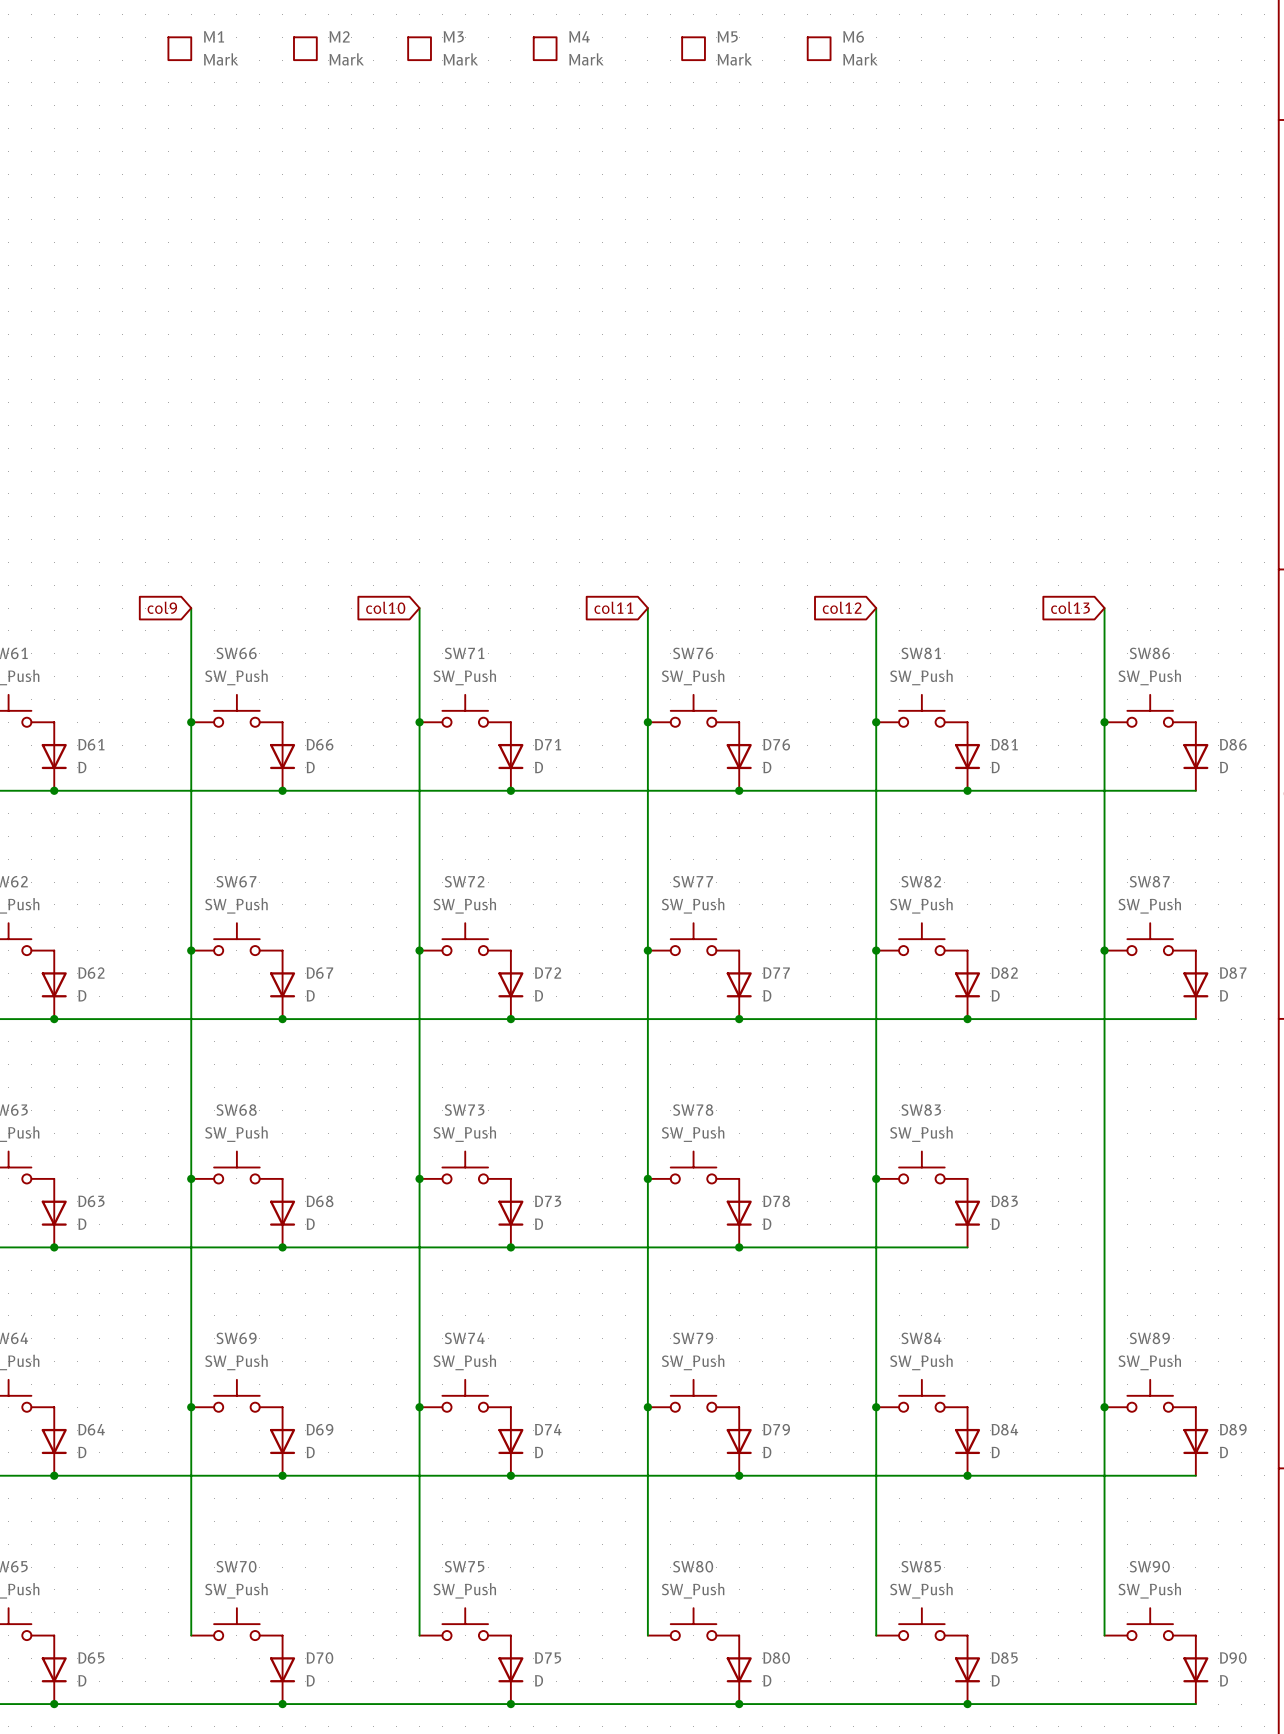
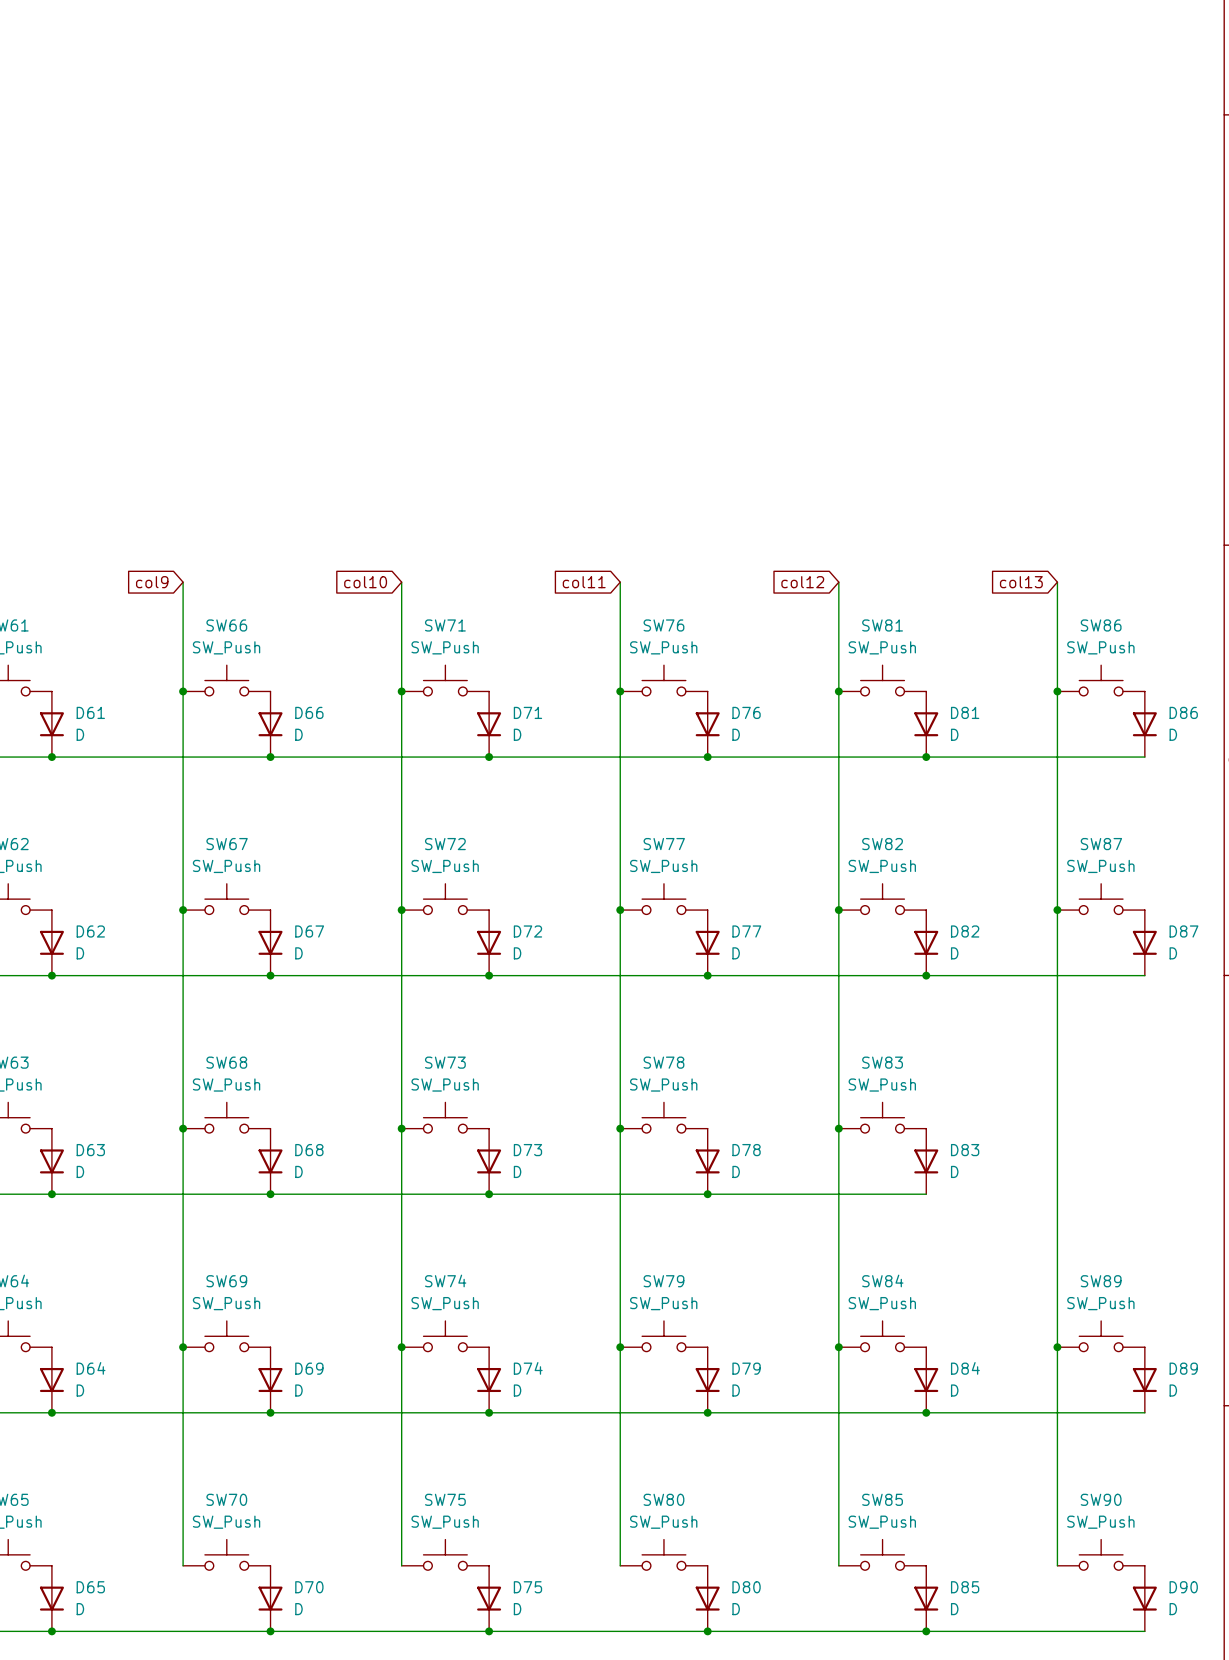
M1: Mark (179, 48) -> none
M2: Mark (305, 48) -> none
M3: Mark (419, 48) -> none
M4: Mark (545, 48) -> none
M5: Mark (693, 48) -> none
M6: Mark (819, 48) -> none

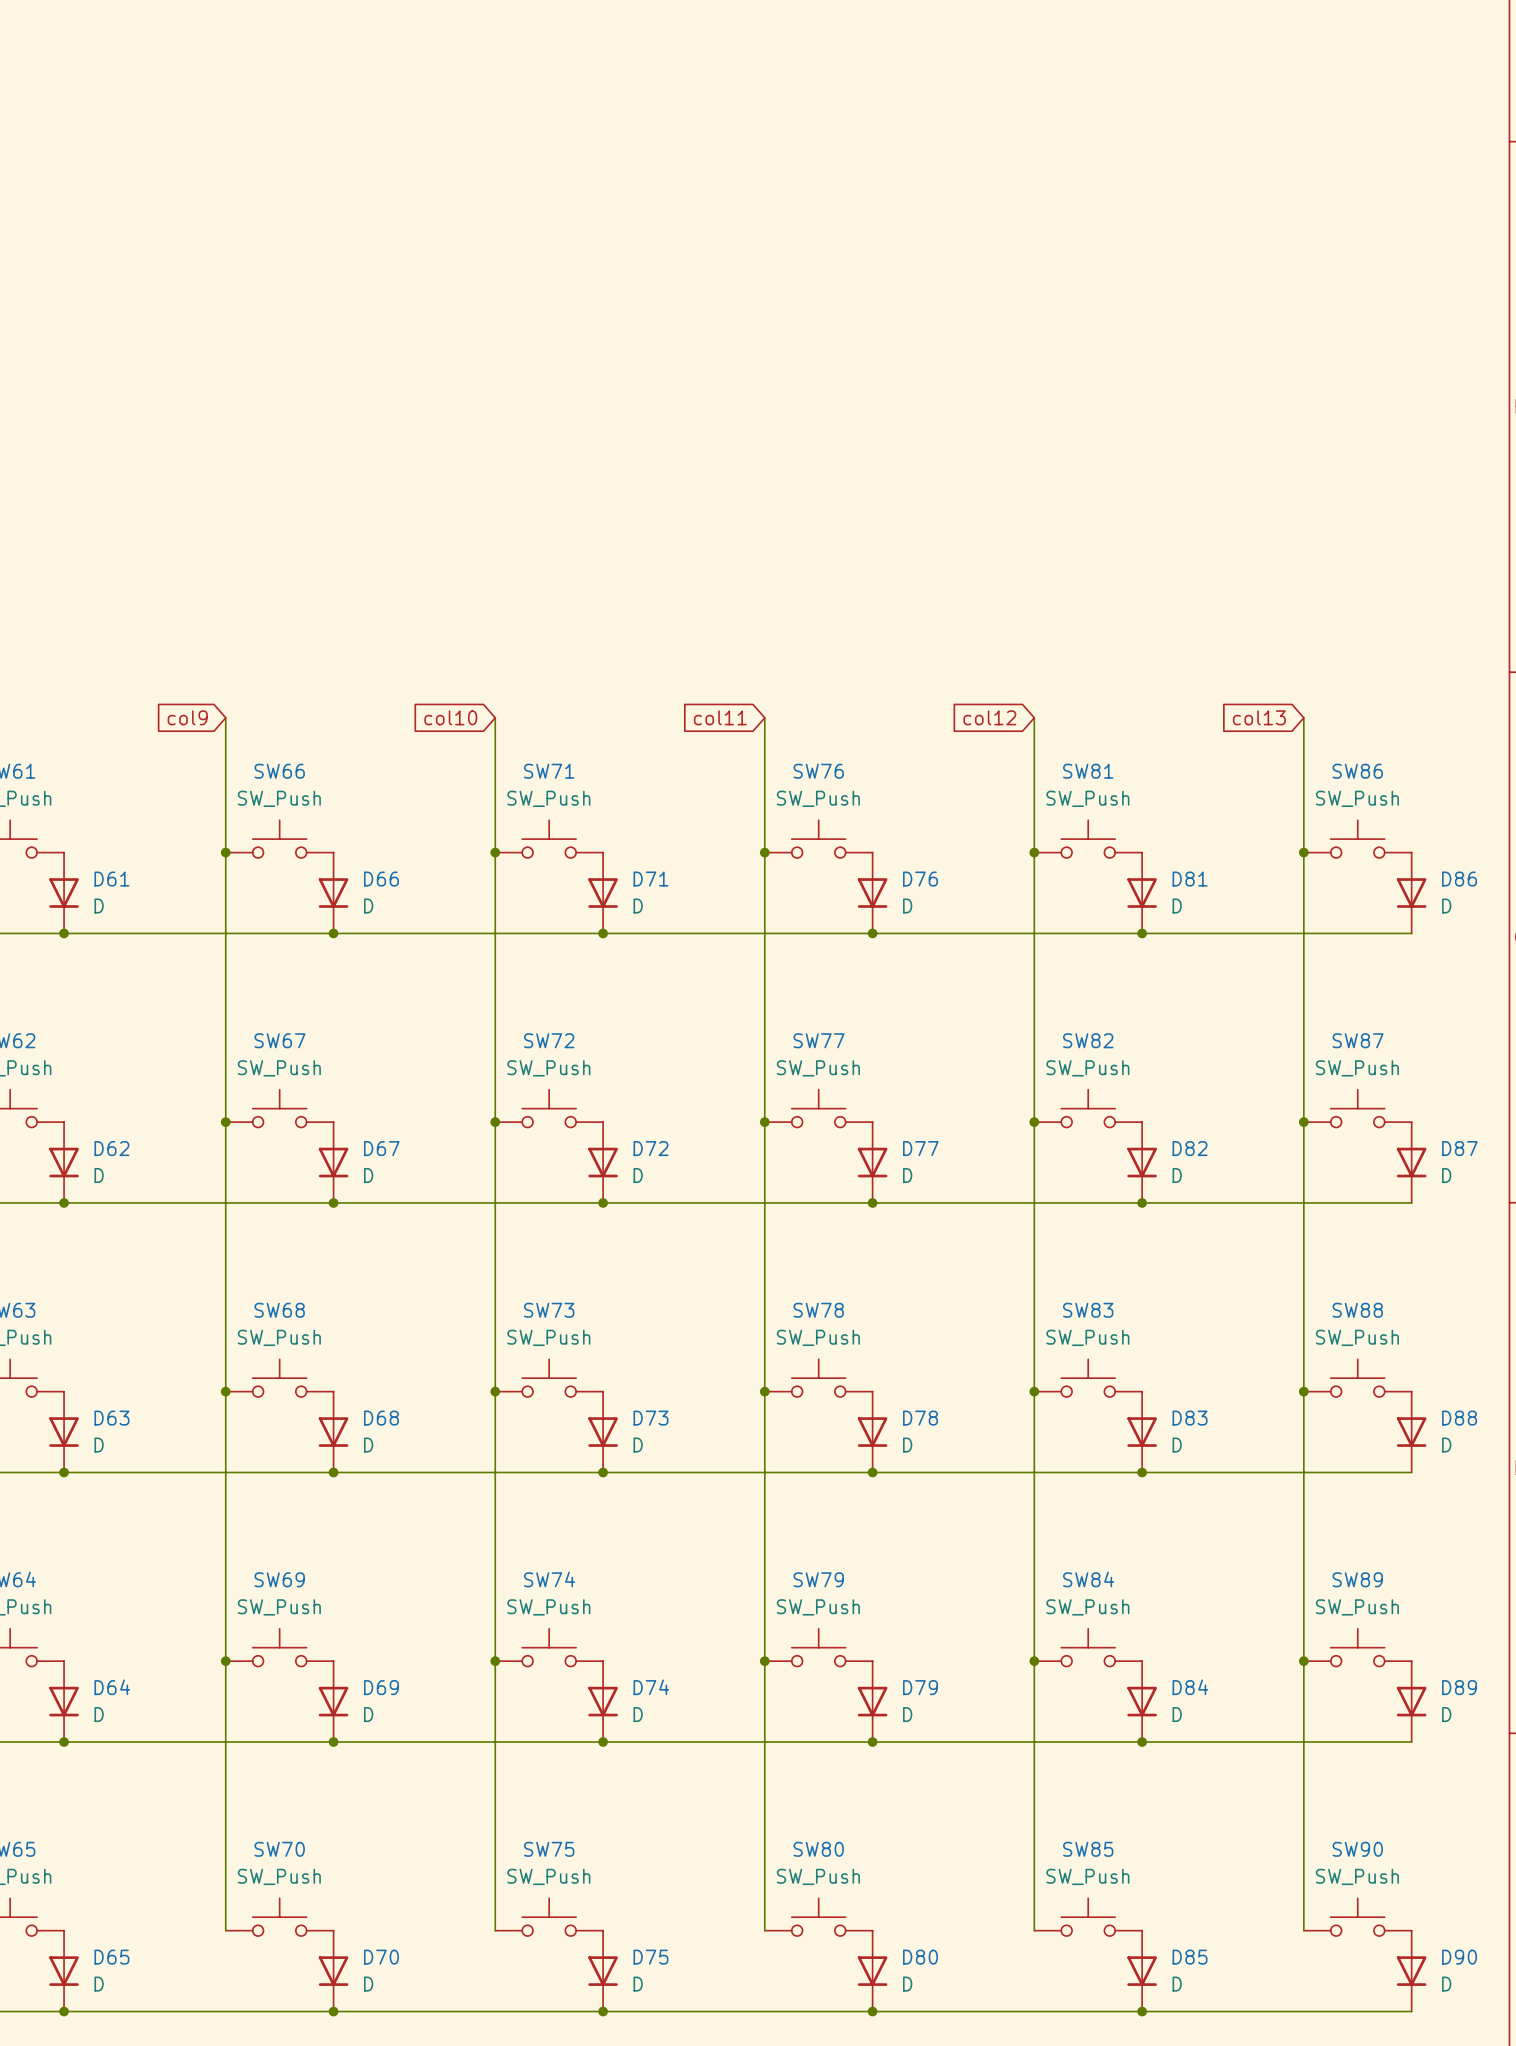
SW88: none -> SW_Push (1357, 1378)
junction: none -> (1303, 1391)
D88: none -> D (1411, 1432)
wire: none -> (1142, 1472) (1411, 1472)
junction: none -> (1142, 1472)

